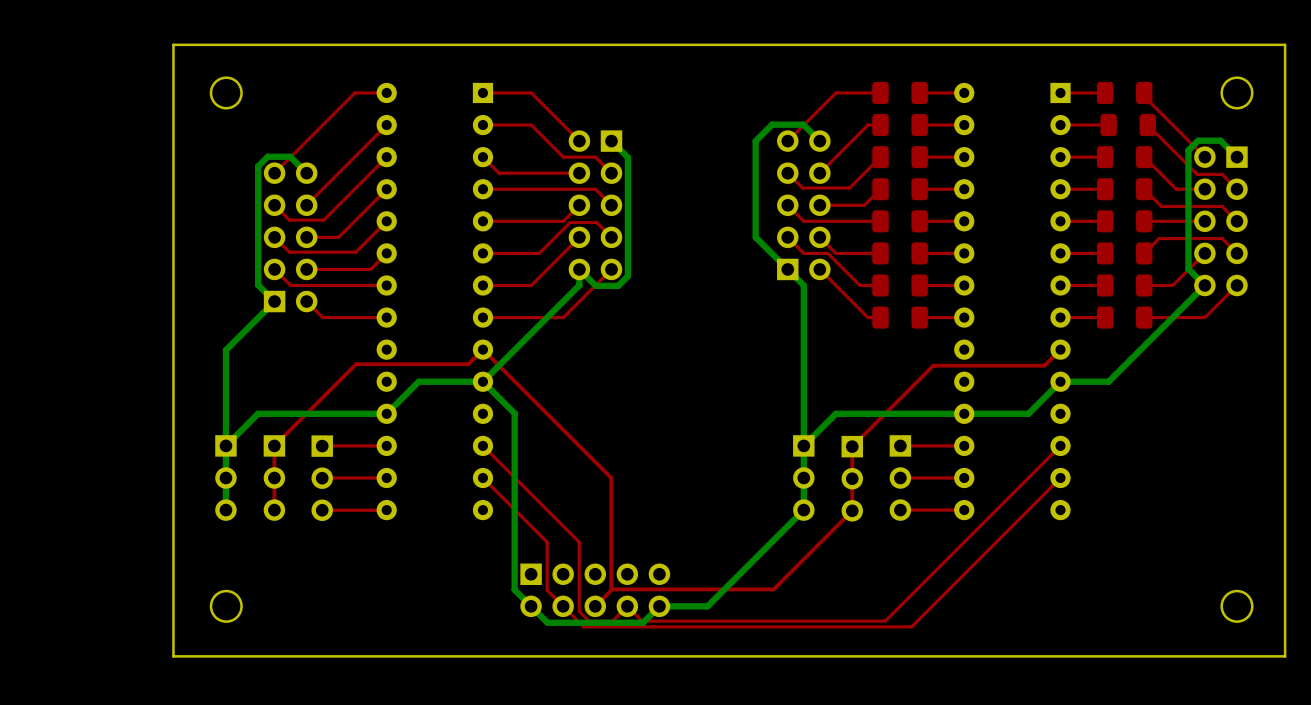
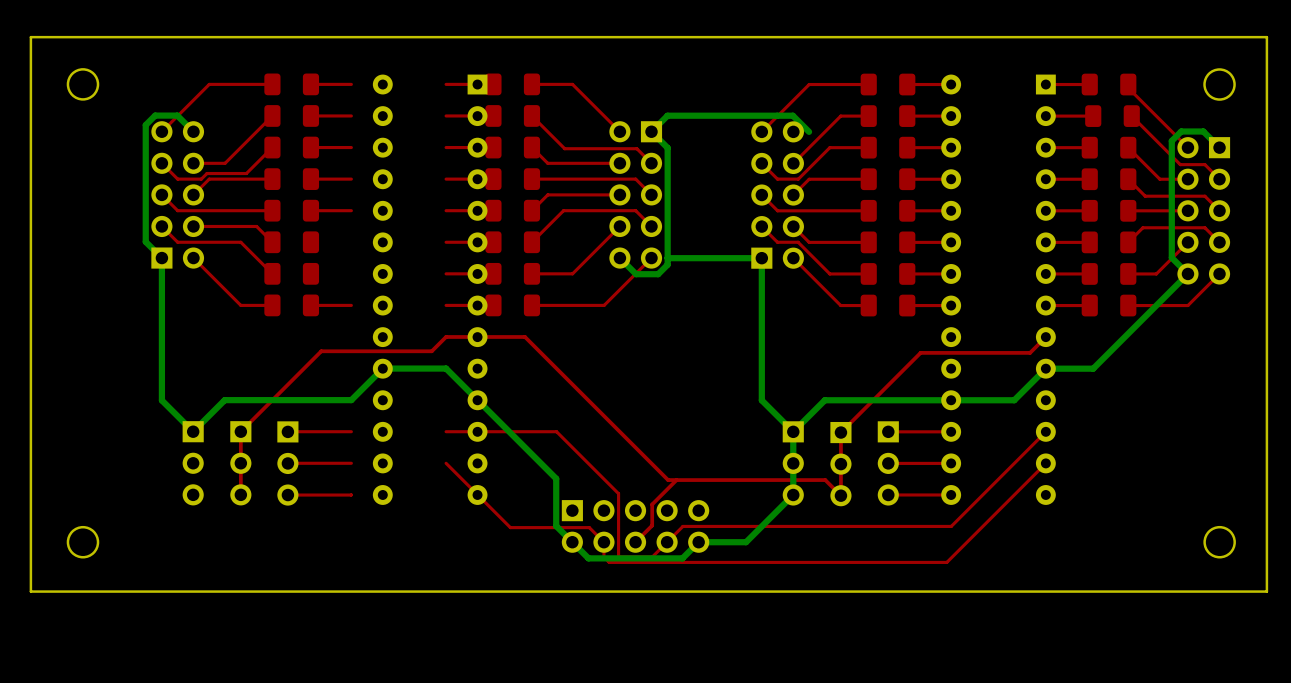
board edge: (173, 44) (173, 656) (1285, 656) (1285, 608) -> (172, 37) (30, 37) (30, 591) (1266, 591)
round board edge position: (226, 92) -> (82, 84)
top track: none -> (272, 84) (209, 84) (161, 131)
part: none -> (291, 84)
top track: none -> (351, 84) (310, 84)
top track: (386, 92) (354, 92) (274, 173) -> none
top track: (482, 92) (531, 92) (579, 141) -> none
top track: none -> (493, 84) (446, 84)
part: none -> (512, 84)
top track: none -> (531, 84) (572, 84) (619, 131)
top track: (835, 92) (787, 141) -> (824, 84) (809, 84) (761, 131)
part: none -> (291, 115)
top track: none -> (351, 115) (310, 115)
top track: none -> (493, 115) (446, 115)
part: none -> (512, 115)
top track: none -> (531, 115) (564, 148) (636, 148) (651, 163)
bottom track: (772, 124) (755, 141) (755, 237) (803, 285) (803, 445) -> (667, 258) (761, 258) (761, 400) (793, 431)
bottom track: none -> (762, 115) (667, 115) (651, 131) (667, 147) (667, 264) (658, 274) (636, 274) (619, 258)
top track: (386, 125) (306, 205) -> none
top track: (482, 125) (531, 125) (563, 157) (595, 157) (611, 173) -> none
top track: (867, 125) (819, 173) -> (856, 116) (840, 116) (793, 163)
bottom track: (611, 141) (627, 157) (627, 276) (618, 285) (595, 285) (579, 269) (579, 285) (482, 381) -> none
top track: none -> (272, 147) (246, 173) (206, 173) (201, 179) (177, 179) (161, 163)
part: none -> (291, 147)
top track: none -> (351, 147) (310, 147)
top track: (386, 157) (323, 220) (289, 220) (274, 205) -> none
top track: (482, 157) (499, 173) (579, 173) -> none
top track: none -> (493, 147) (446, 147)
part: none -> (512, 147)
top track: none -> (531, 147) (547, 163) (619, 163)
top track: (880, 157) (849, 188) (802, 188) (787, 173) -> (868, 147) (829, 147) (798, 179) (777, 179) (761, 163)
bottom track: (306, 173) (290, 156) (267, 156) (258, 166) (258, 285) (274, 301) (225, 350) (225, 510) -> none
top track: none -> (272, 179) (209, 179) (193, 194)
part: none -> (291, 179)
top track: none -> (351, 179) (310, 179)
top track: (386, 189) (338, 237) (306, 237) -> (272, 115) (225, 163) (193, 163)
top track: (482, 189) (595, 189) (611, 205) -> none
top track: none -> (493, 179) (446, 179)
part: none -> (512, 179)
top track: none -> (531, 179) (635, 179) (651, 194)
top track: (880, 189) (864, 205) (819, 205) -> (868, 179) (809, 179) (793, 195)
top track: (579, 205) (563, 221) (482, 221) -> none
part position: (595, 205) -> (635, 194)
top track: none -> (619, 194) (547, 194) (531, 210)
top track: (787, 205) (803, 221) -> (761, 195) (777, 210) (793, 210)
part position: (803, 205) -> (777, 195)
part: none -> (291, 210)
top track: none -> (351, 210) (310, 210)
top track: (386, 221) (355, 252) (289, 252) (274, 237) -> none
top track: none -> (493, 210) (446, 210)
part: none -> (512, 210)
top track: none -> (161, 226) (177, 242) (240, 242) (272, 273)
top track: none -> (193, 226) (256, 226) (272, 242)
part position: (290, 237) -> (177, 194)
top track: (579, 237) (531, 285) (482, 285) -> none
top track: (611, 237) (596, 222) (570, 222) (539, 253) (482, 253) -> none
top track: none -> (619, 226) (572, 273) (531, 273)
top track: none -> (651, 226) (635, 210) (563, 210) (531, 242)
top track: (787, 237) (803, 253) (819, 253) -> (793, 226) (809, 242)
top track: (819, 237) (835, 253) -> (816, 242) (824, 242)
part: none -> (291, 242)
top track: (386, 253) (370, 269) (306, 269) -> none
top track: none -> (493, 242) (446, 242)
part: none -> (512, 242)
top track: (827, 253) (859, 285) -> (761, 226) (777, 242) (798, 242) (829, 273) (848, 273)
top track: none -> (193, 258) (240, 305) (272, 305)
top track: (274, 269) (290, 285) (386, 285) -> (161, 194) (177, 210) (272, 210)
top track: (611, 269) (563, 317) (482, 317) -> none
top track: none -> (651, 258) (604, 305) (531, 305)
top track: (819, 269) (867, 317) -> (793, 258) (840, 305) (856, 305)
part: none -> (291, 273)
top track: none -> (493, 273) (446, 273)
part: none -> (512, 273)
top track: (306, 301) (322, 317) (386, 317) -> none
part: none -> (291, 305)
top track: none -> (351, 305) (310, 305)
top track: none -> (493, 305) (446, 305)
part: none -> (512, 305)
bottom track: (482, 381) (514, 413) (514, 589) (547, 622) (643, 622) (659, 606) (707, 606) (755, 558) -> (193, 131) (177, 115) (155, 115) (145, 125) (145, 241) (161, 258) (161, 400) (193, 431) (224, 400) (351, 400) (382, 368) (446, 368) (556, 478) (556, 526) (588, 558) (682, 558) (698, 542) (746, 542)
bottom track: (482, 381) (418, 381) (386, 413) (258, 413) (225, 445) -> none
top track: (386, 445) (322, 446) -> (351, 431) (287, 431)
top track: (482, 445) (579, 542) (579, 611) (589, 621) (612, 621) (627, 606) (642, 621) (885, 621) (964, 542) -> (446, 431) (556, 431) (618, 493) (618, 556) (652, 556) (682, 526) (951, 526)
part: none -> (193, 463)
part: none -> (240, 463)
part: (225, 478) -> none
part: (274, 478) -> none
part: none -> (287, 463)
part: (322, 478) -> none
top track: (386, 478) (322, 478) -> (351, 463) (287, 463)
top track: (482, 478) (547, 542) (547, 590) (583, 626) (911, 626) (959, 578) -> (446, 463) (510, 527) (589, 527) (603, 542) (603, 557) (609, 562) (946, 562)
top track: none -> (676, 480) (652, 504) (652, 525) (635, 542)
top track: (274, 510) (274, 445) (356, 364) (468, 364) (482, 349) (611, 478) (611, 590) -> none
top track: (386, 510) (322, 510) -> (351, 494) (287, 495)
top track: (852, 510) (773, 589) (612, 589) (595, 606) -> (840, 495) (825, 480) (668, 480) (525, 336) (446, 336) (431, 351) (321, 351) (240, 431) (240, 494)
part position: (595, 590) -> (635, 526)
round board edge position: (226, 606) -> (82, 542)
round board edge position: (1236, 606) -> (1219, 542)

